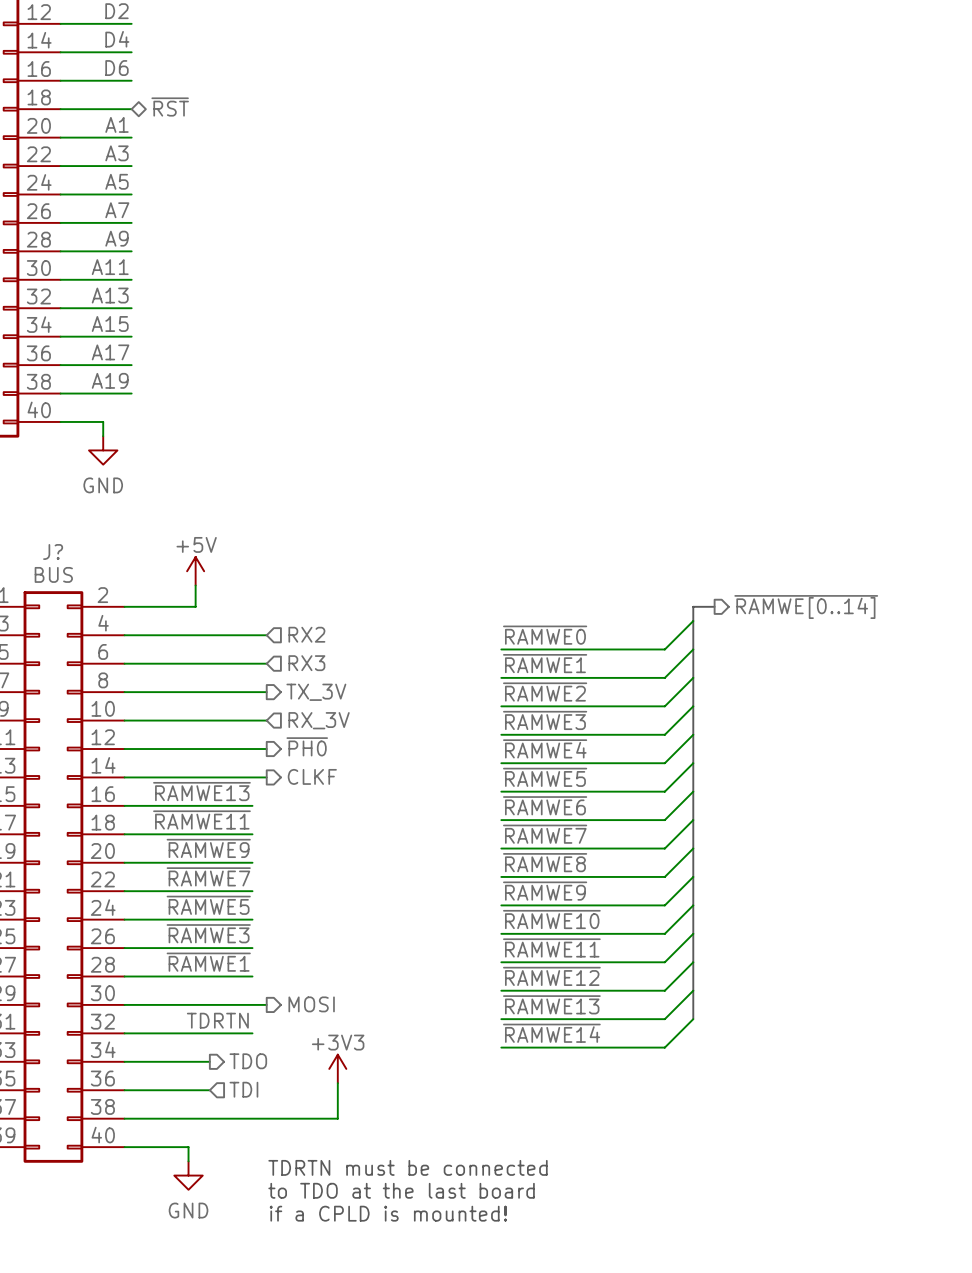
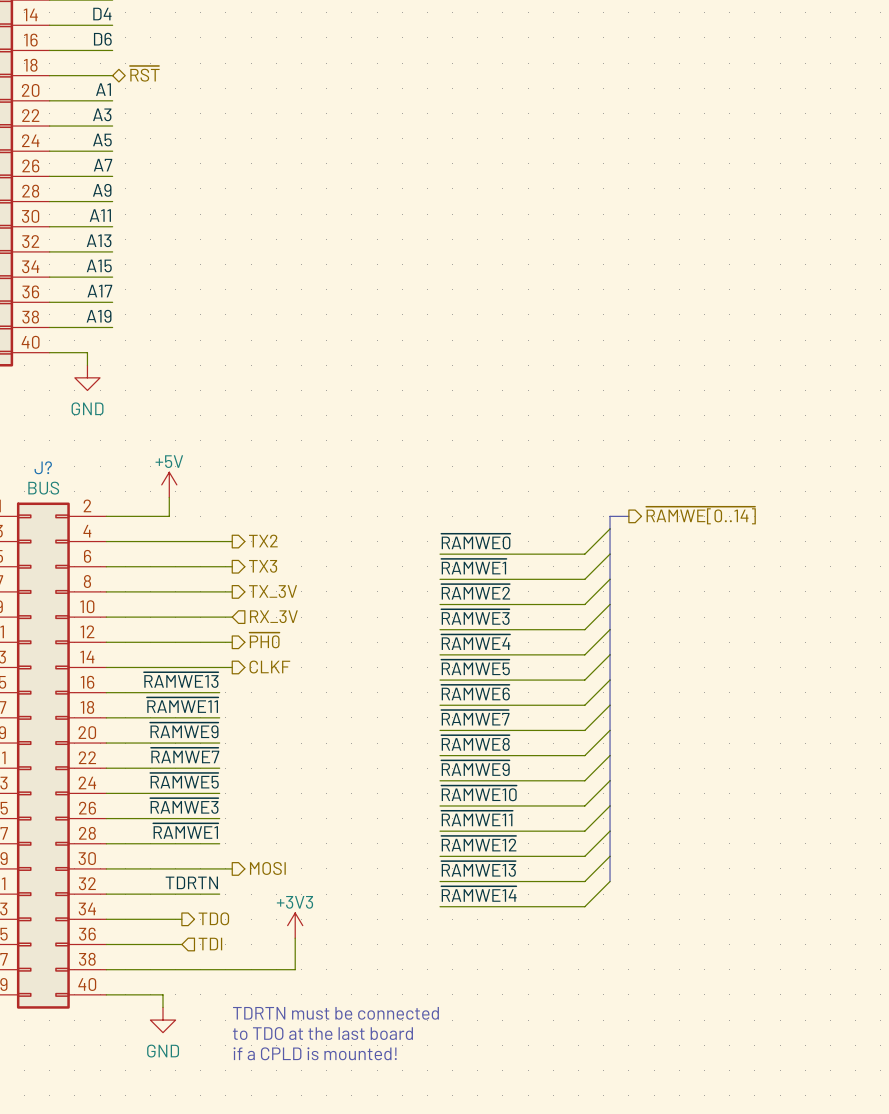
hierarchical label shape: input (306, 634) -> output (263, 541)
hierarchical label: RX2 (306, 634) -> TX2 (263, 541)
hierarchical label shape: input (306, 663) -> output (263, 566)
hierarchical label: RX3 (306, 663) -> TX3 (263, 566)

